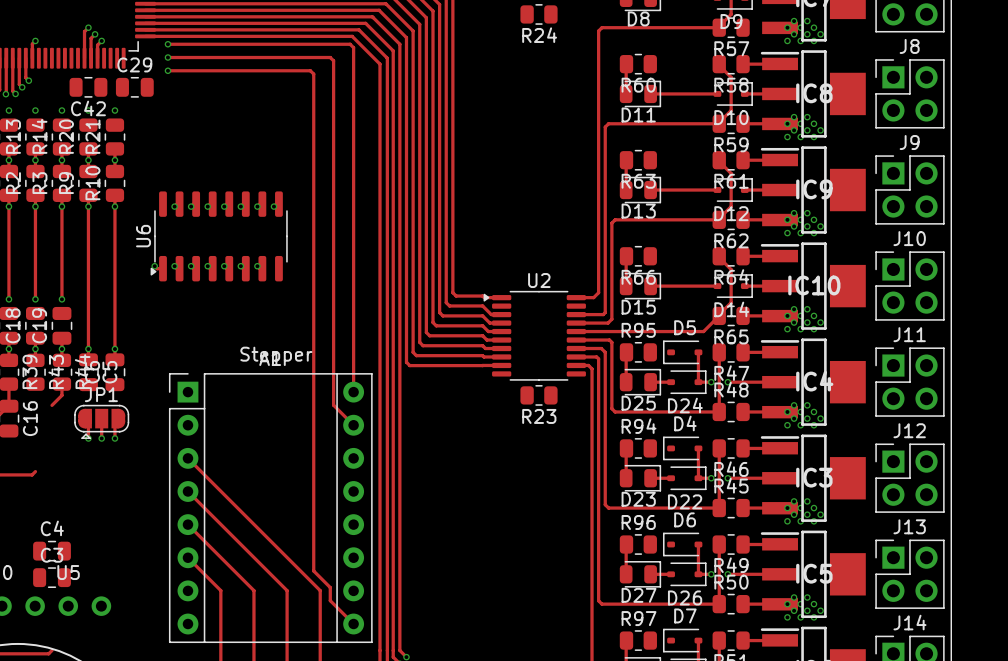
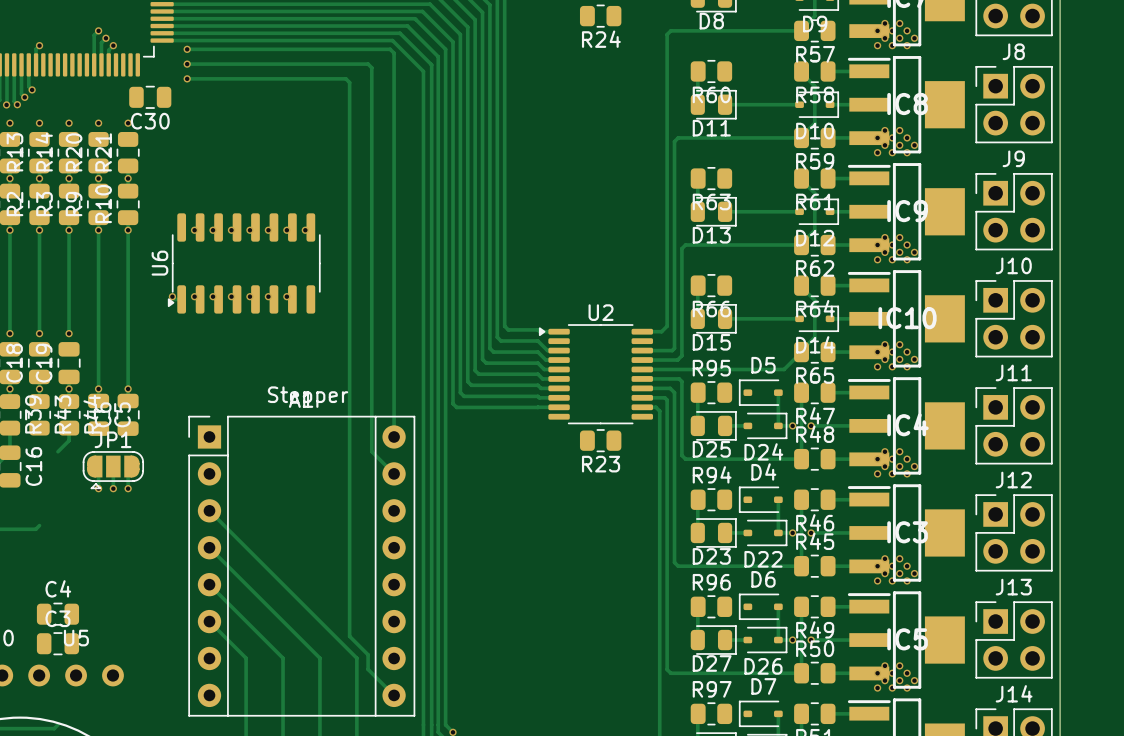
C29 name: C29 (134, 64) -> C30 (150, 121)
C42: (88, 87) -> none

